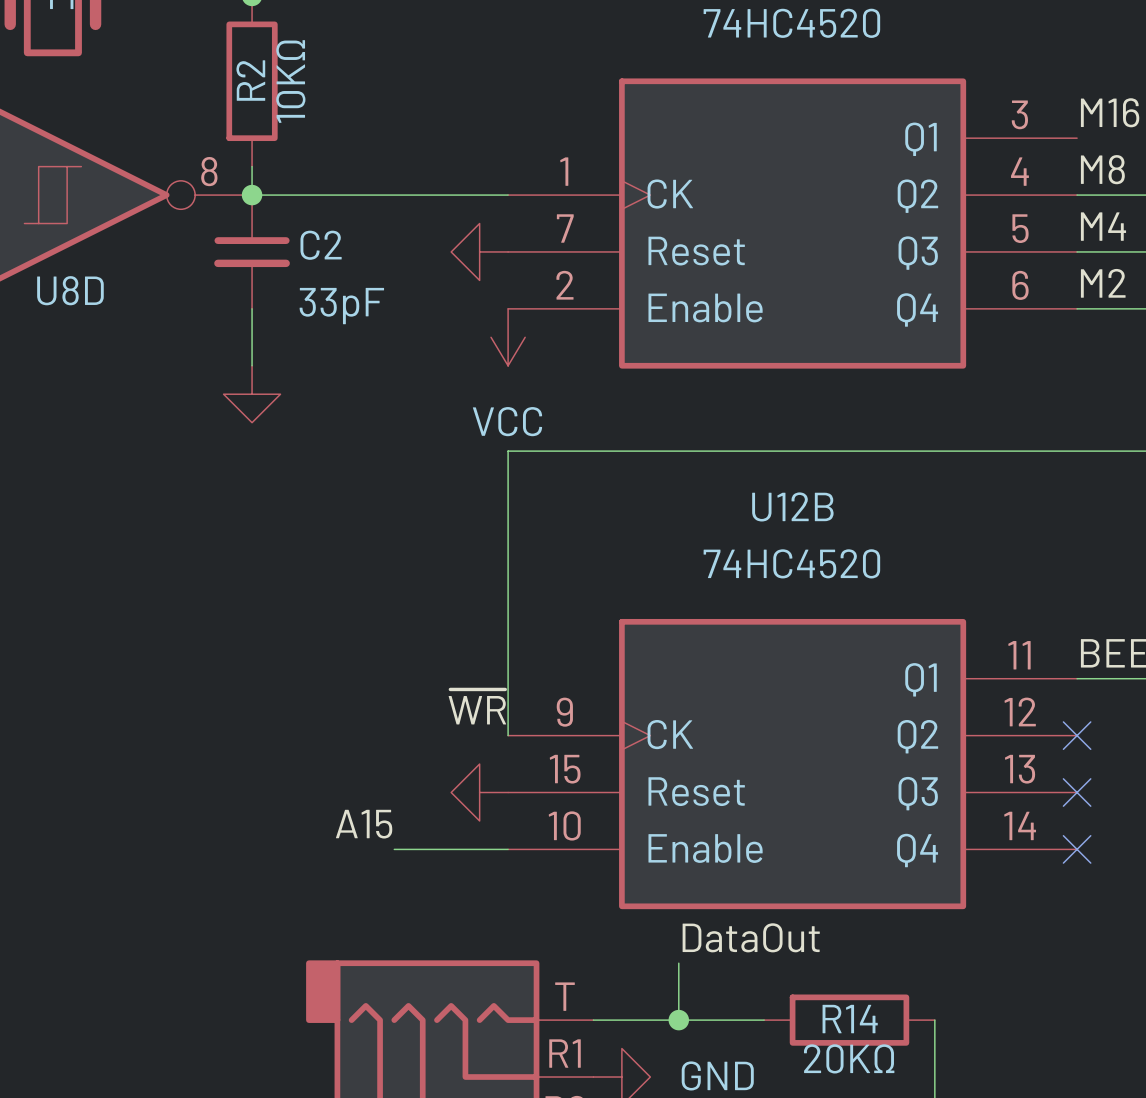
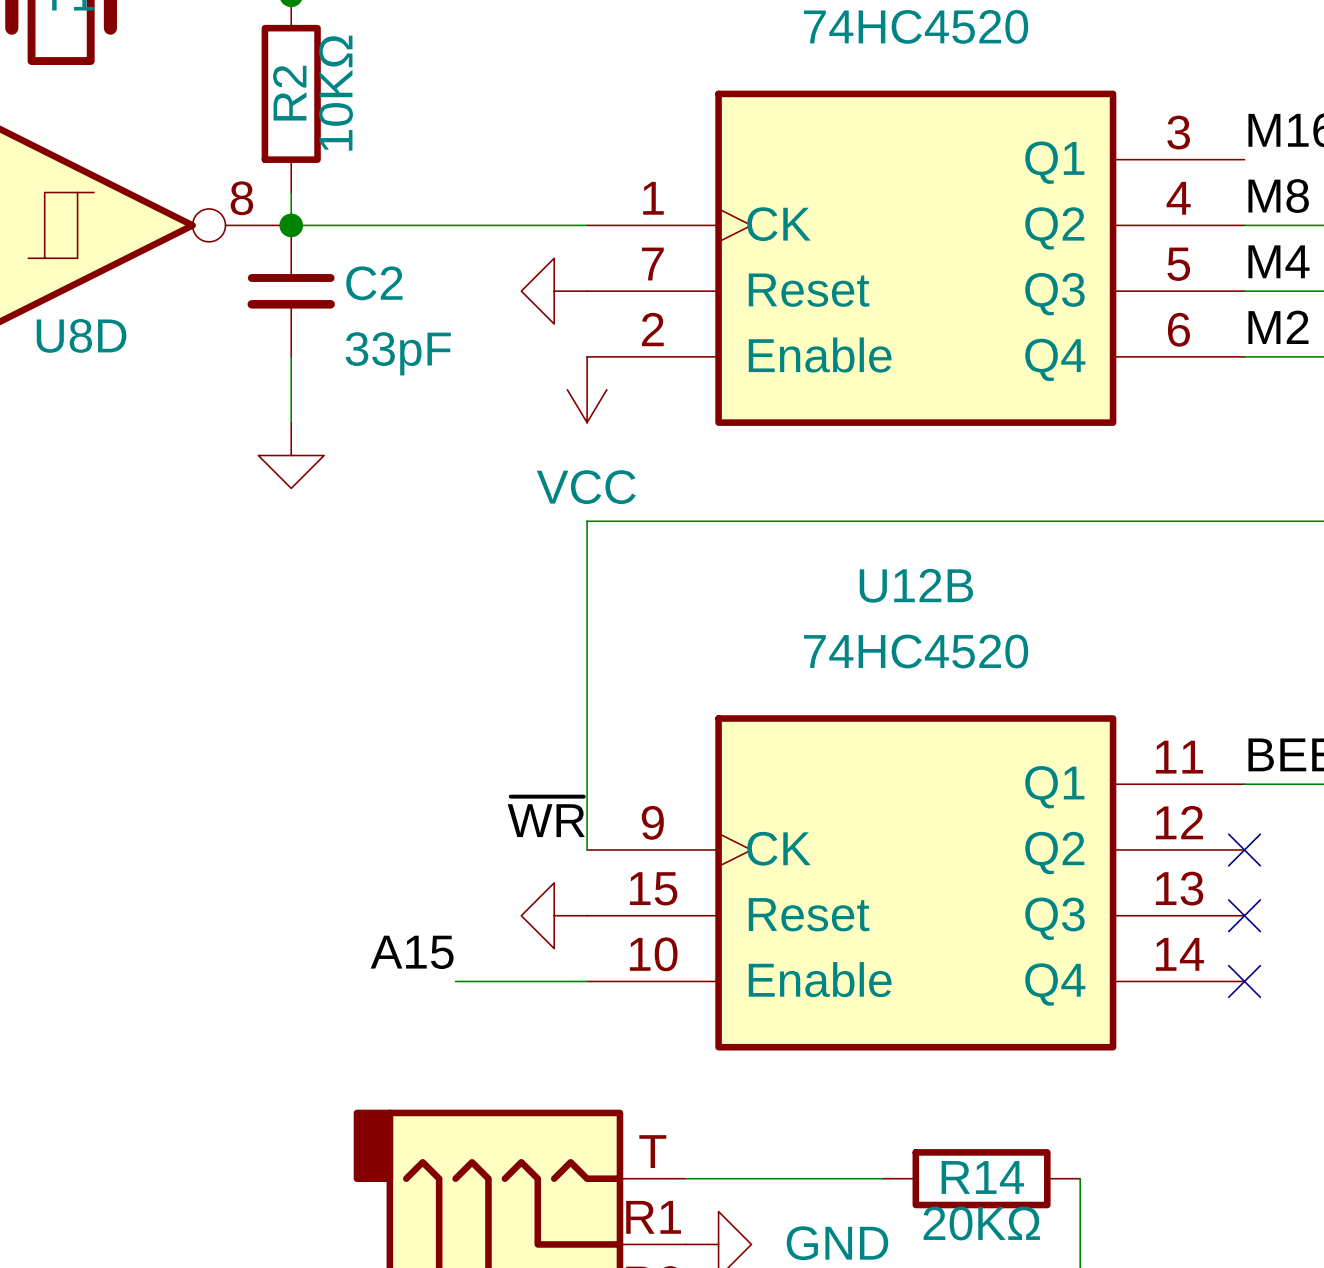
label: DataOut (751, 937) -> none
wire: (678, 963) (678, 1020) -> none
junction: (678, 1020) -> none

